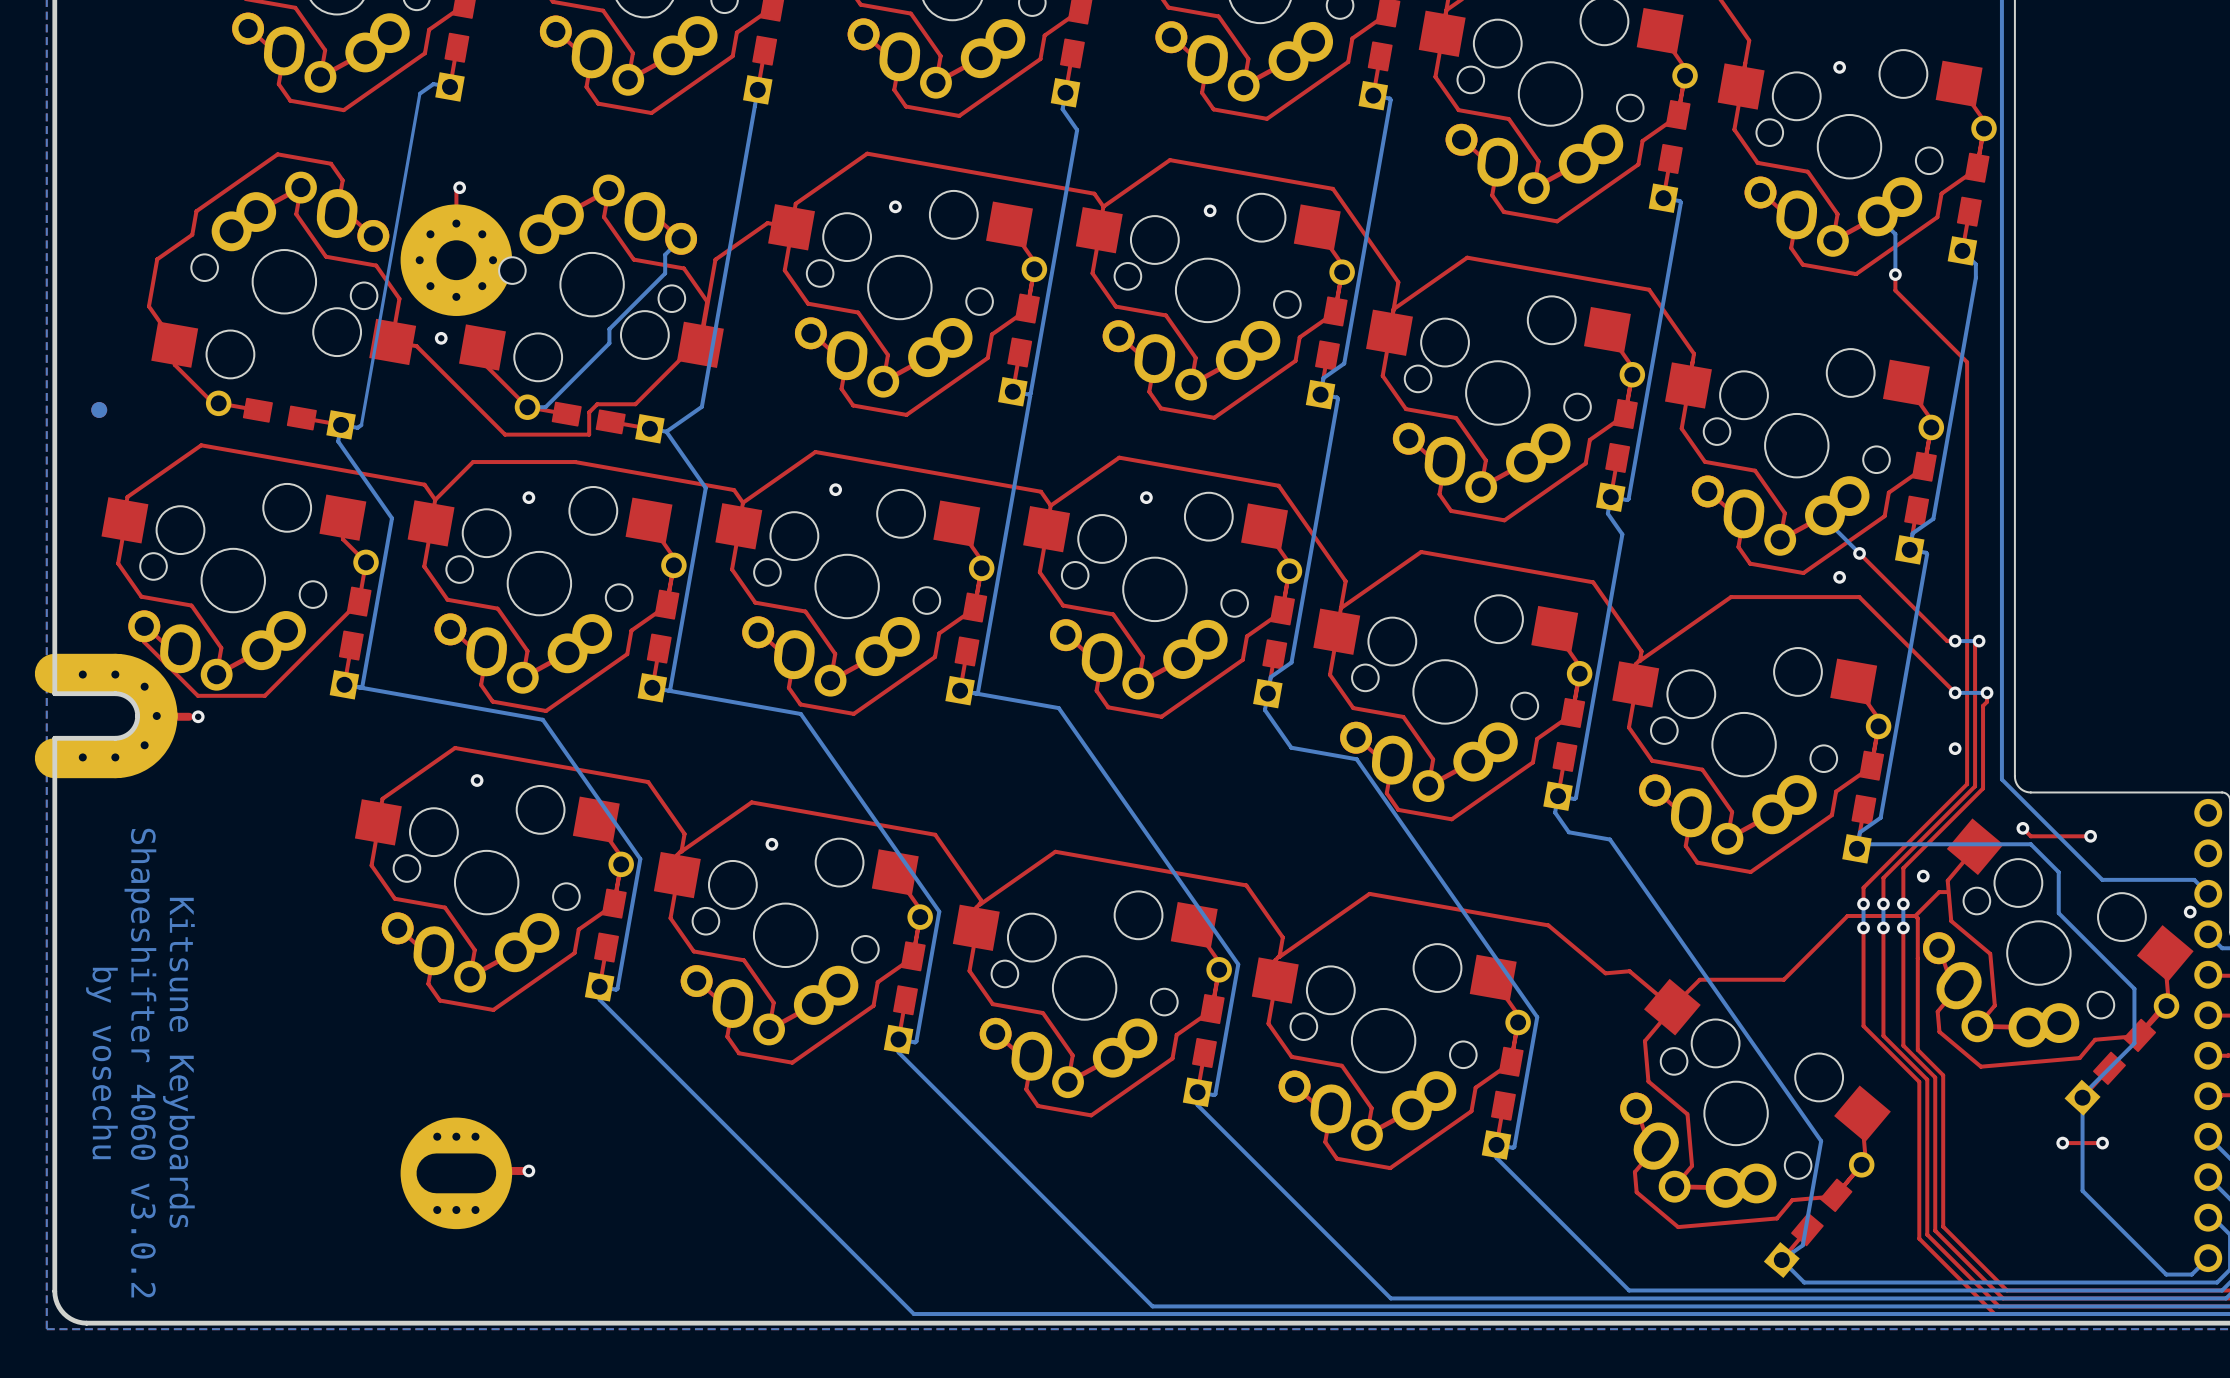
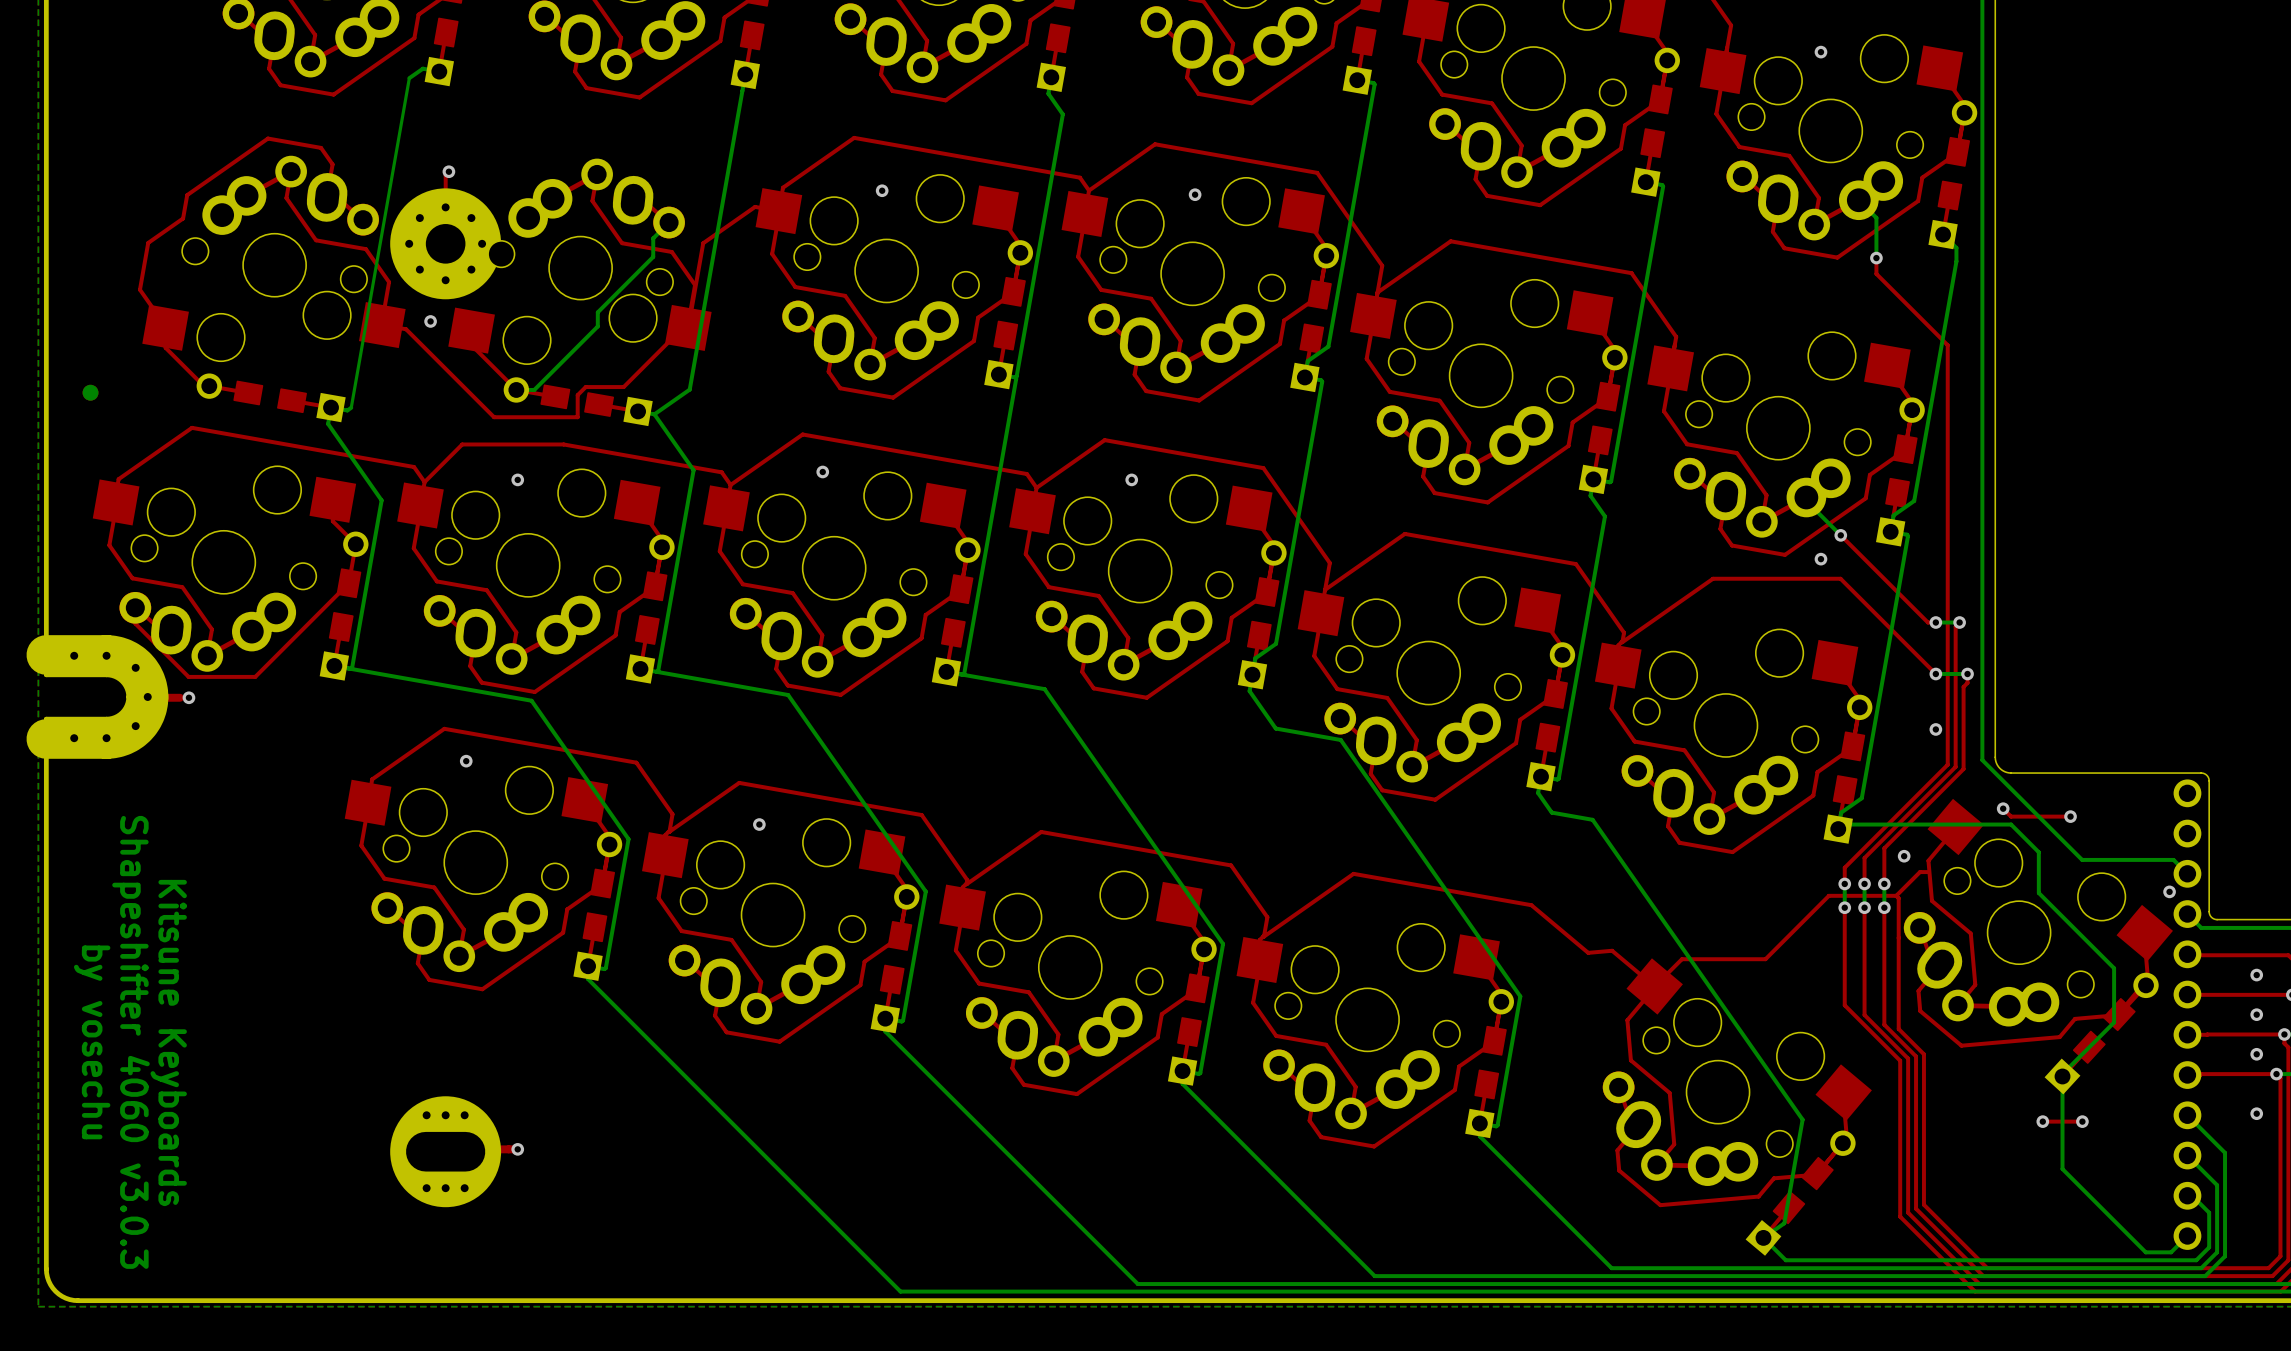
text: Shapeshifter 4060 v3.0.2 (140, 1063) -> Shapeshifter 4060 v3.0.3 (130, 1042)

